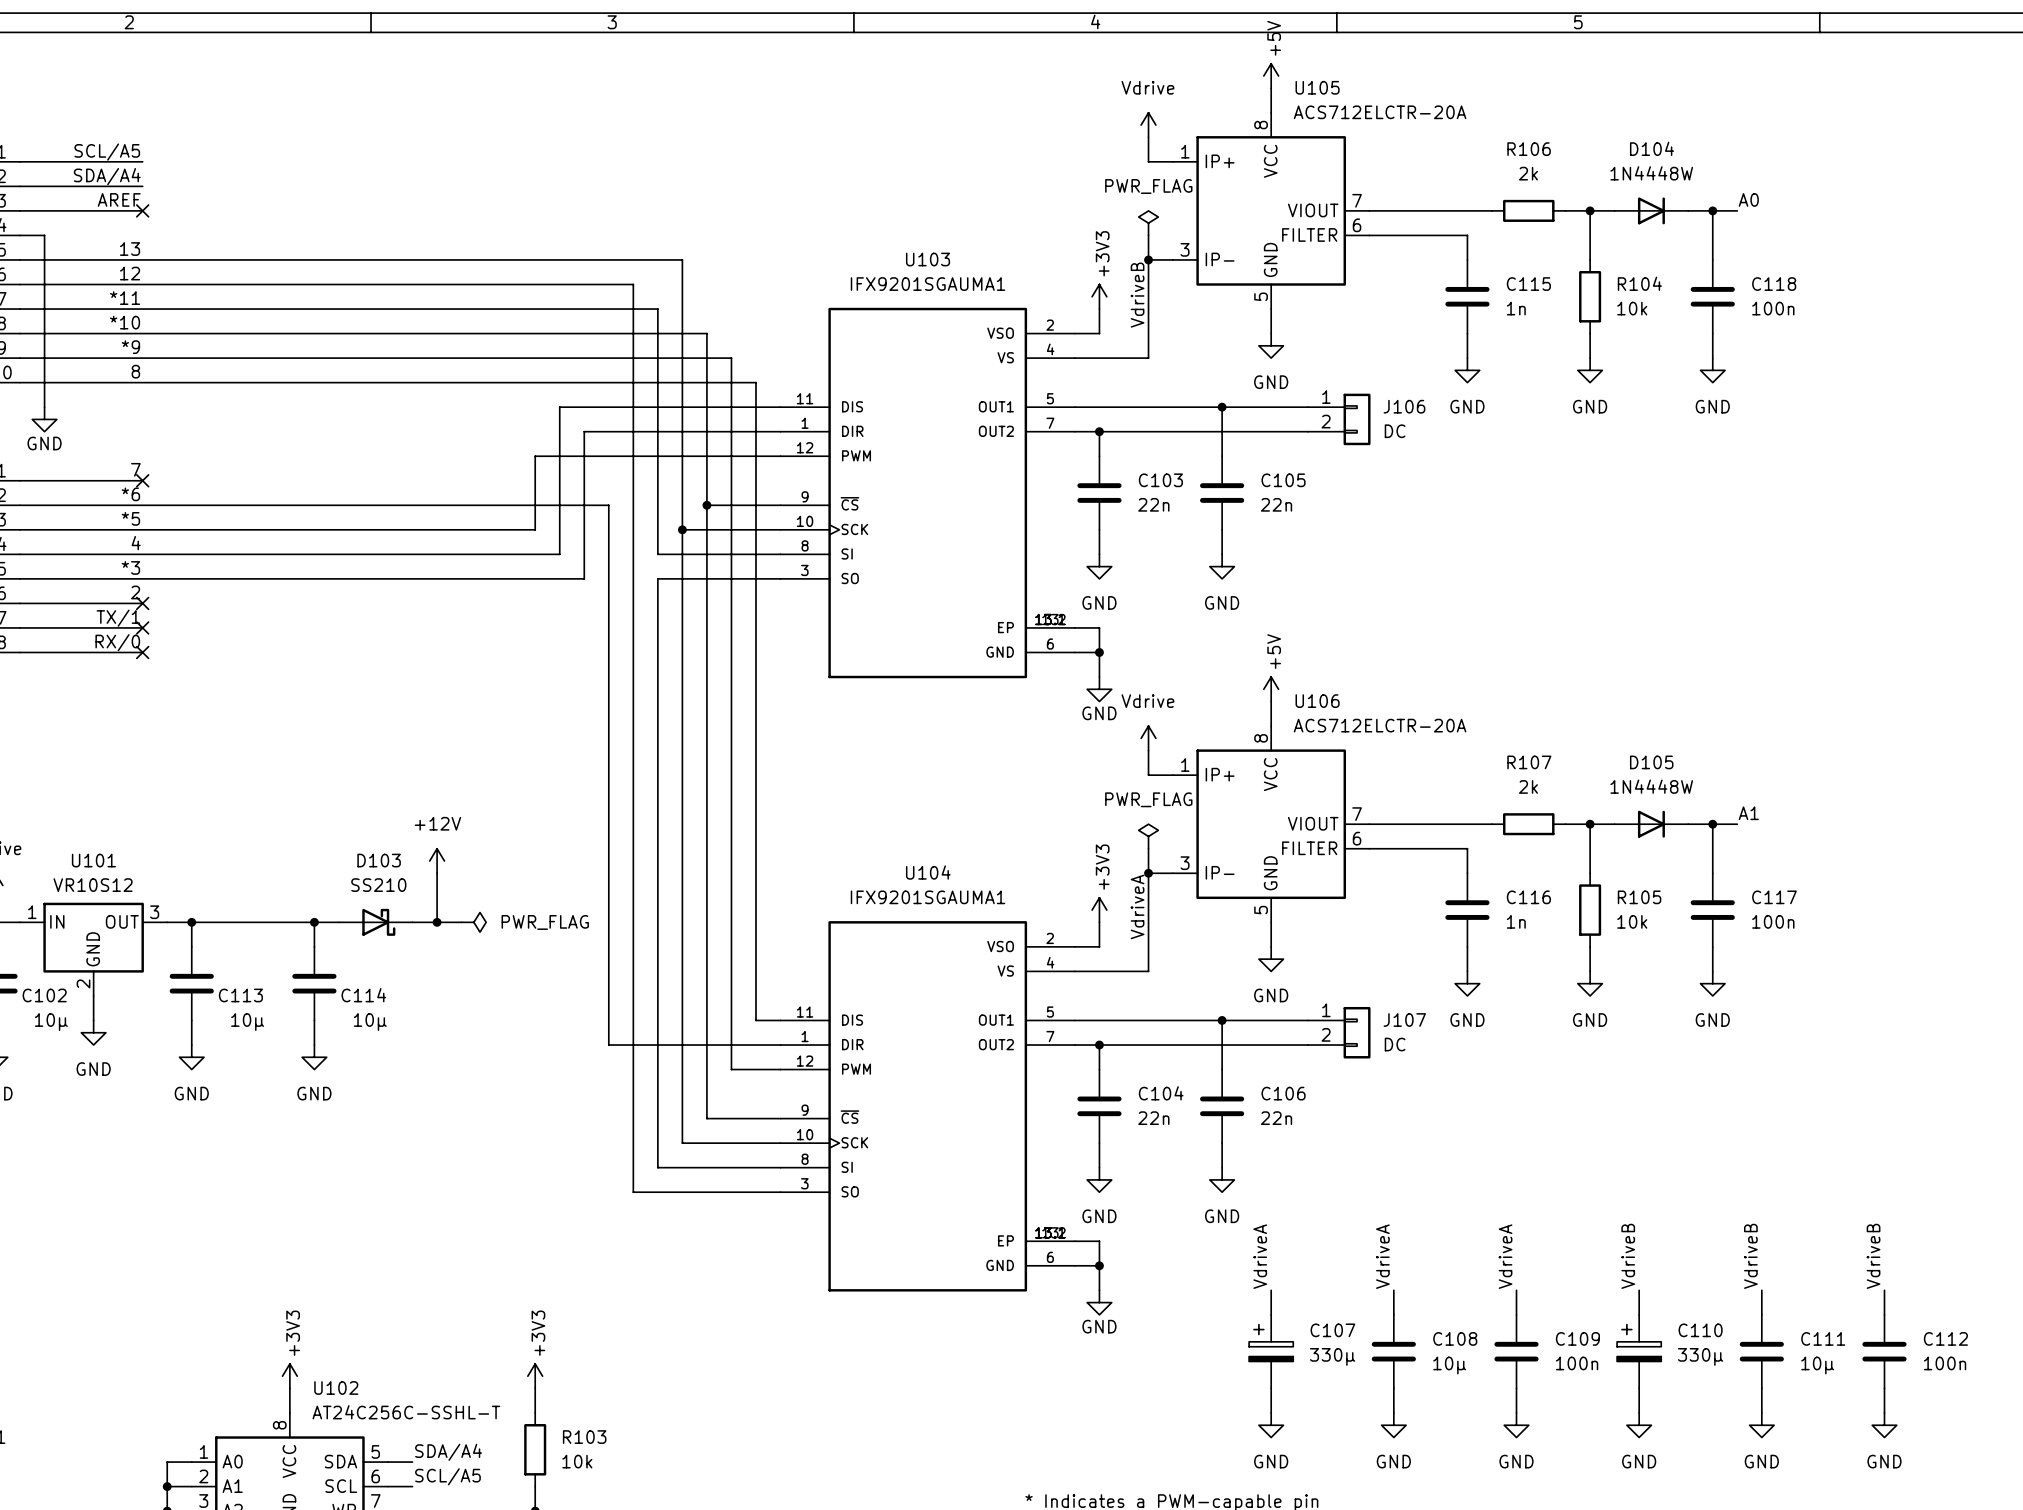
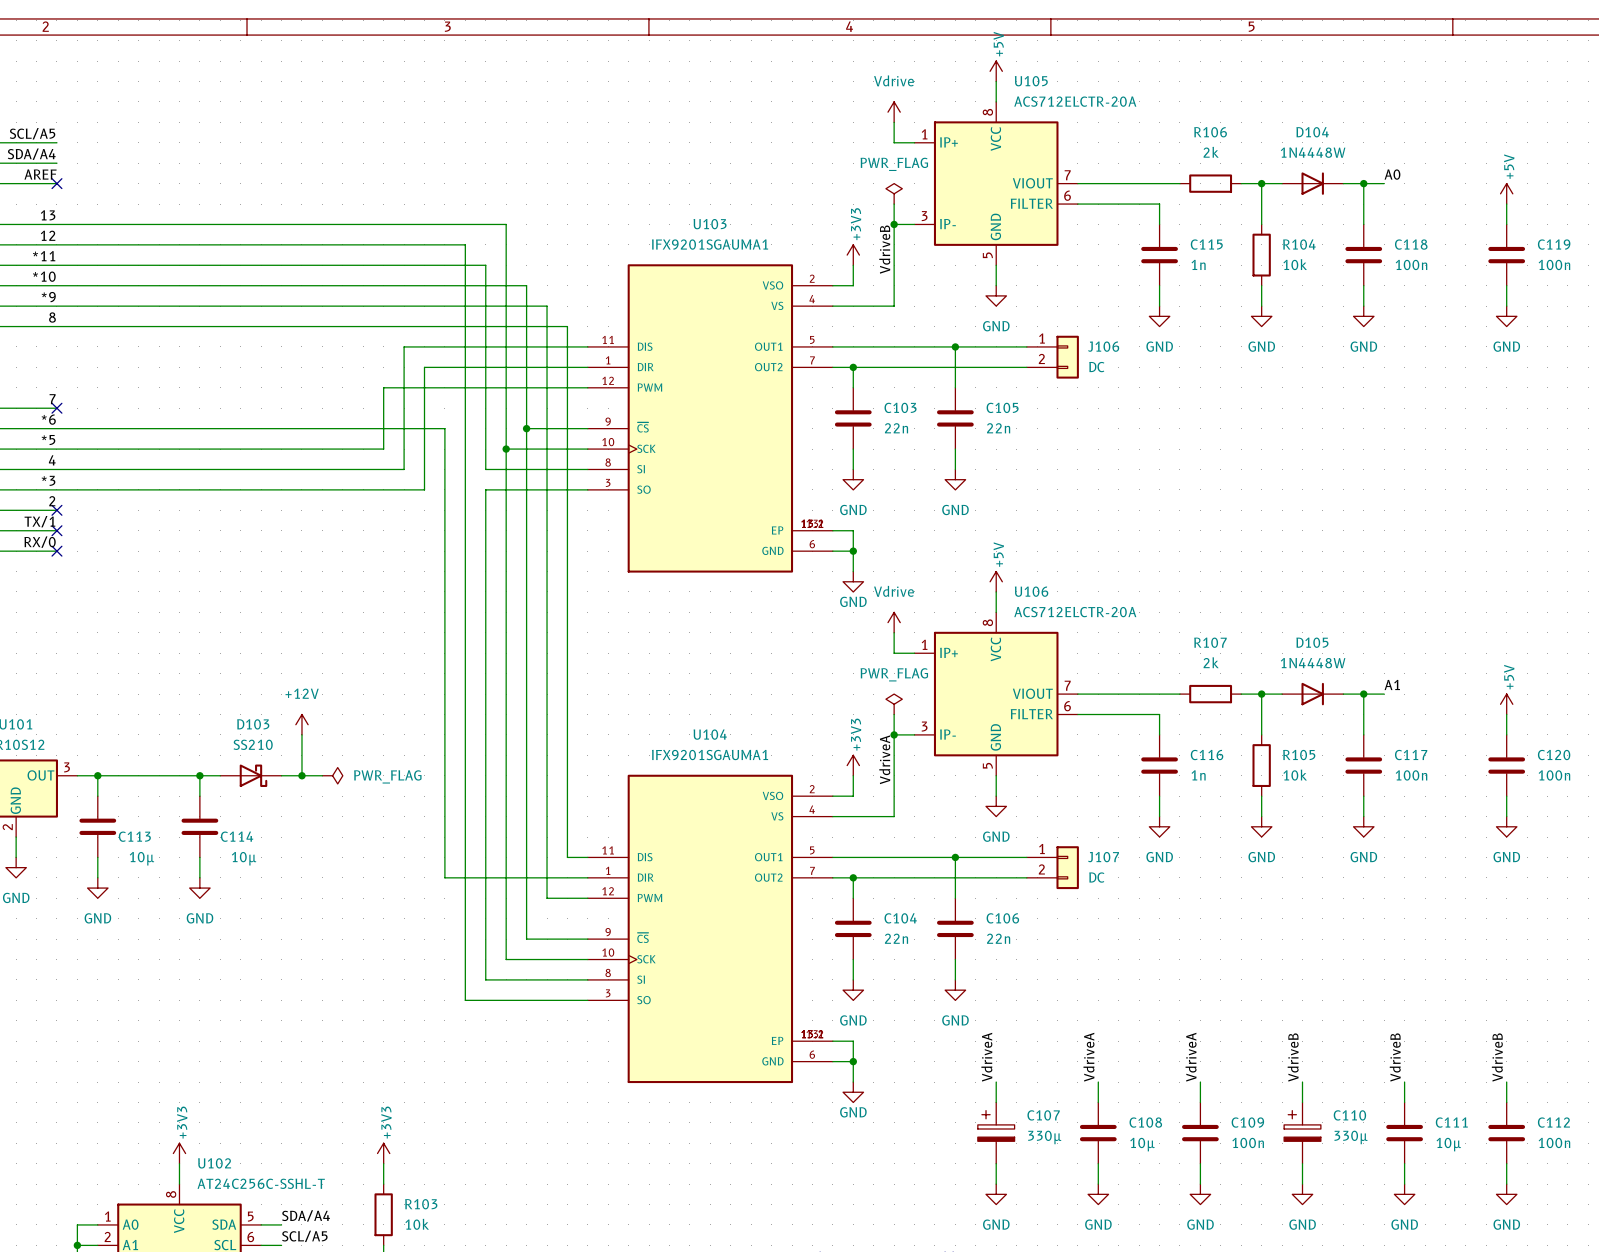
power symbol: none -> +5V (1506, 193)
wire: none -> (1506, 204) (1506, 224)
C119: none -> 100n (1506, 255)
wire: none -> (1506, 285) (1506, 306)
power symbol: none -> GND (1506, 316)
power symbol: none -> +5V (1506, 704)
wire: none -> (1506, 714) (1506, 734)
C120: none -> 100n (1506, 765)
wire: none -> (1506, 796) (1506, 816)
power symbol: none -> GND (1506, 826)

